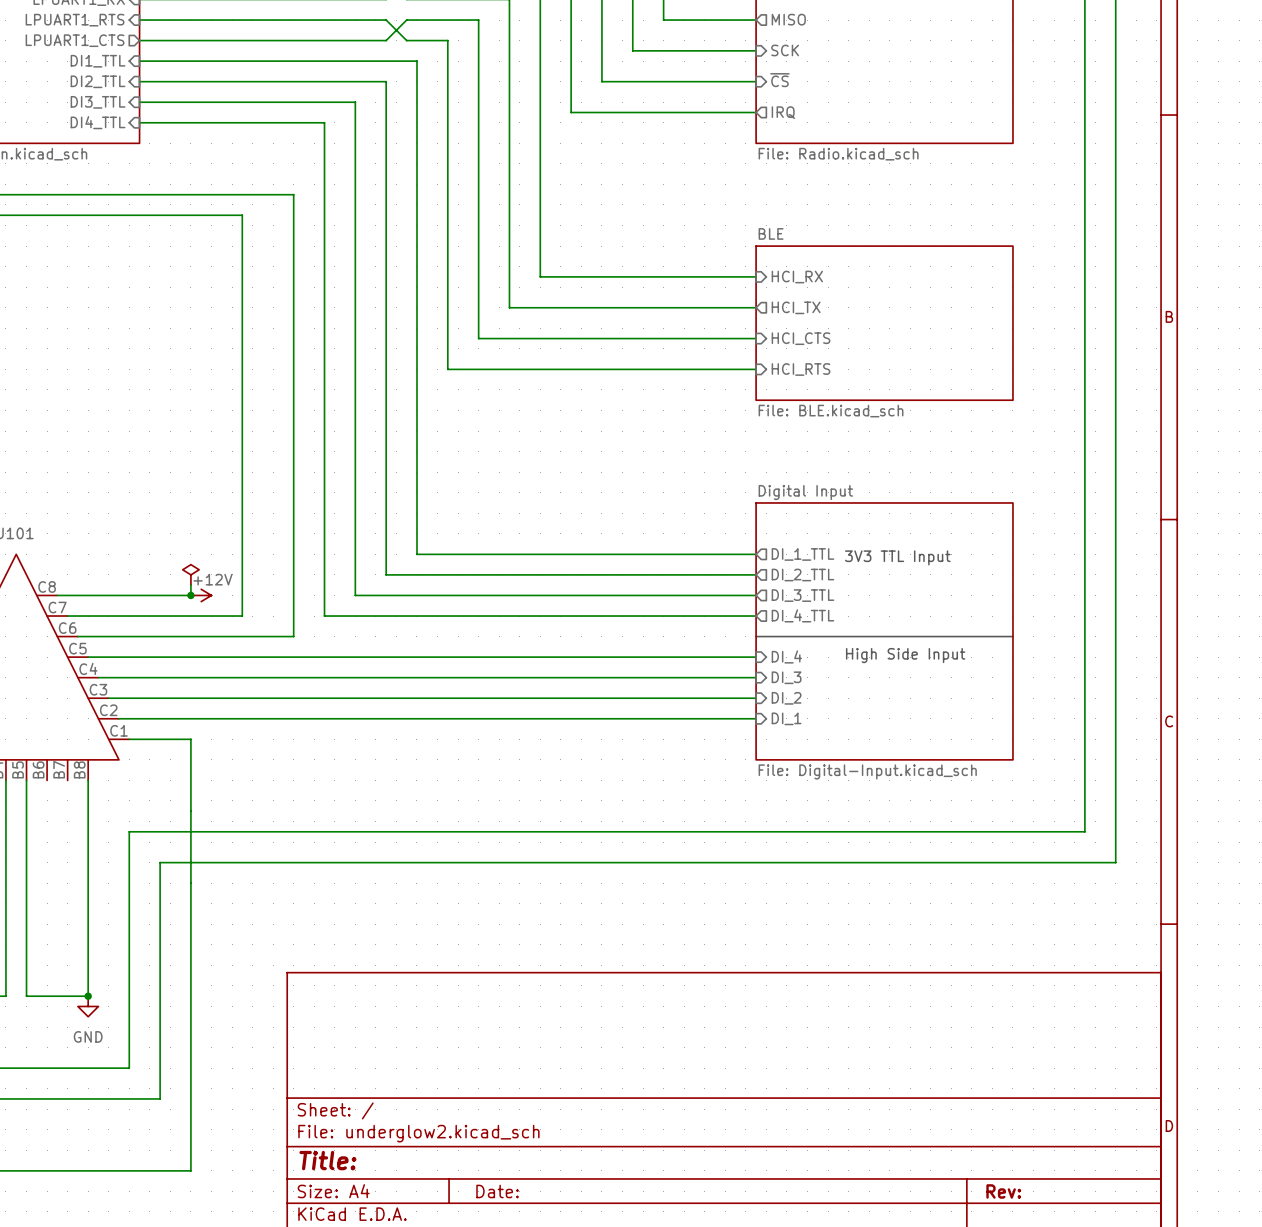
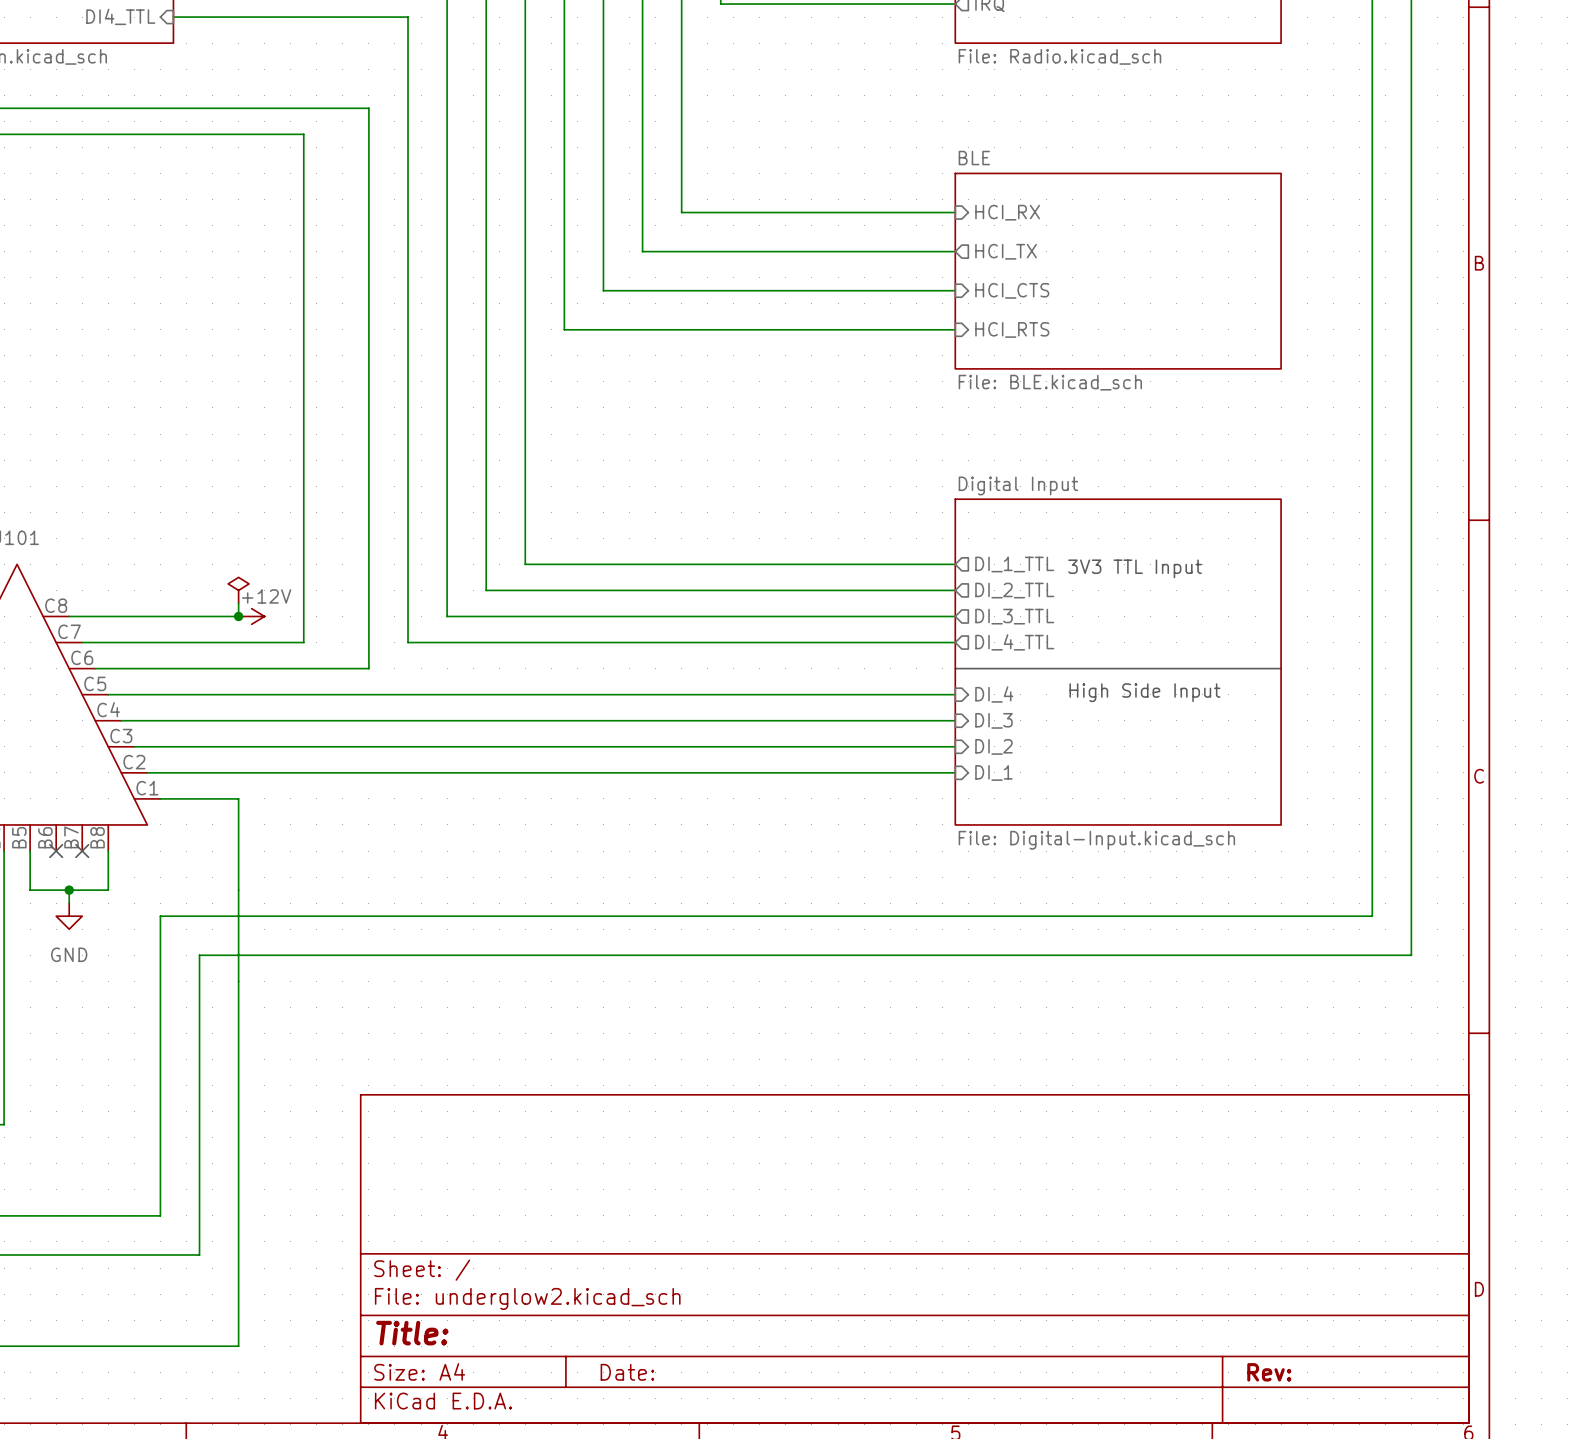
no-connect mark: none -> (56, 851)
no-connect mark: none -> (82, 851)
wire: (26, 811) (26, 996) (88, 996) (88, 811) -> (30, 890) (108, 890)
wire: none -> (69, 890) (69, 903)
junction: none -> (69, 890)
junction: (88, 996) -> none
power symbol position: GND (88, 1006) -> GND (69, 916)

